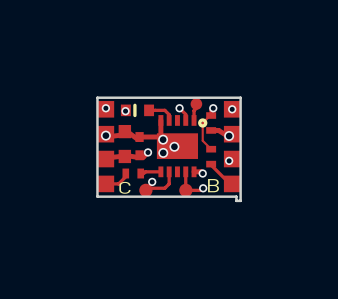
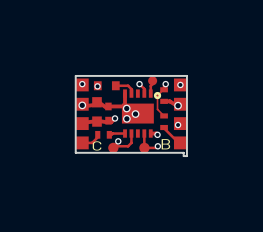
line: (134, 105) (134, 115) -> none

